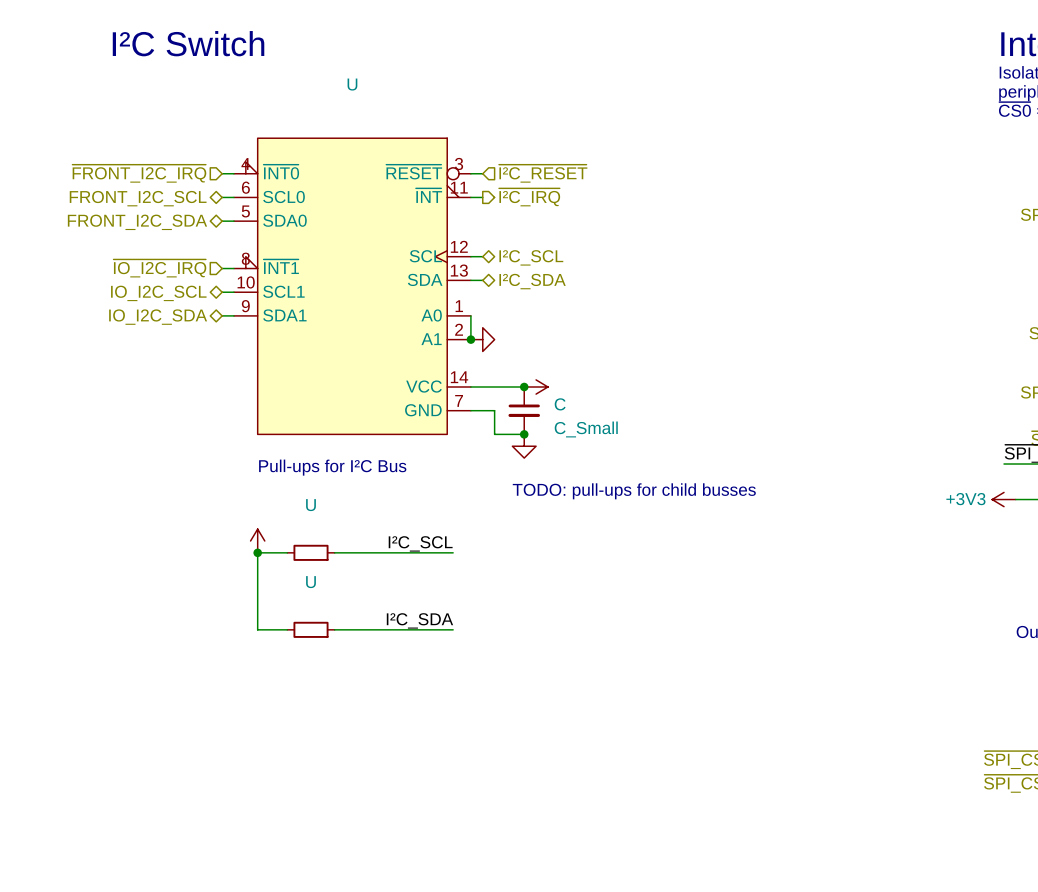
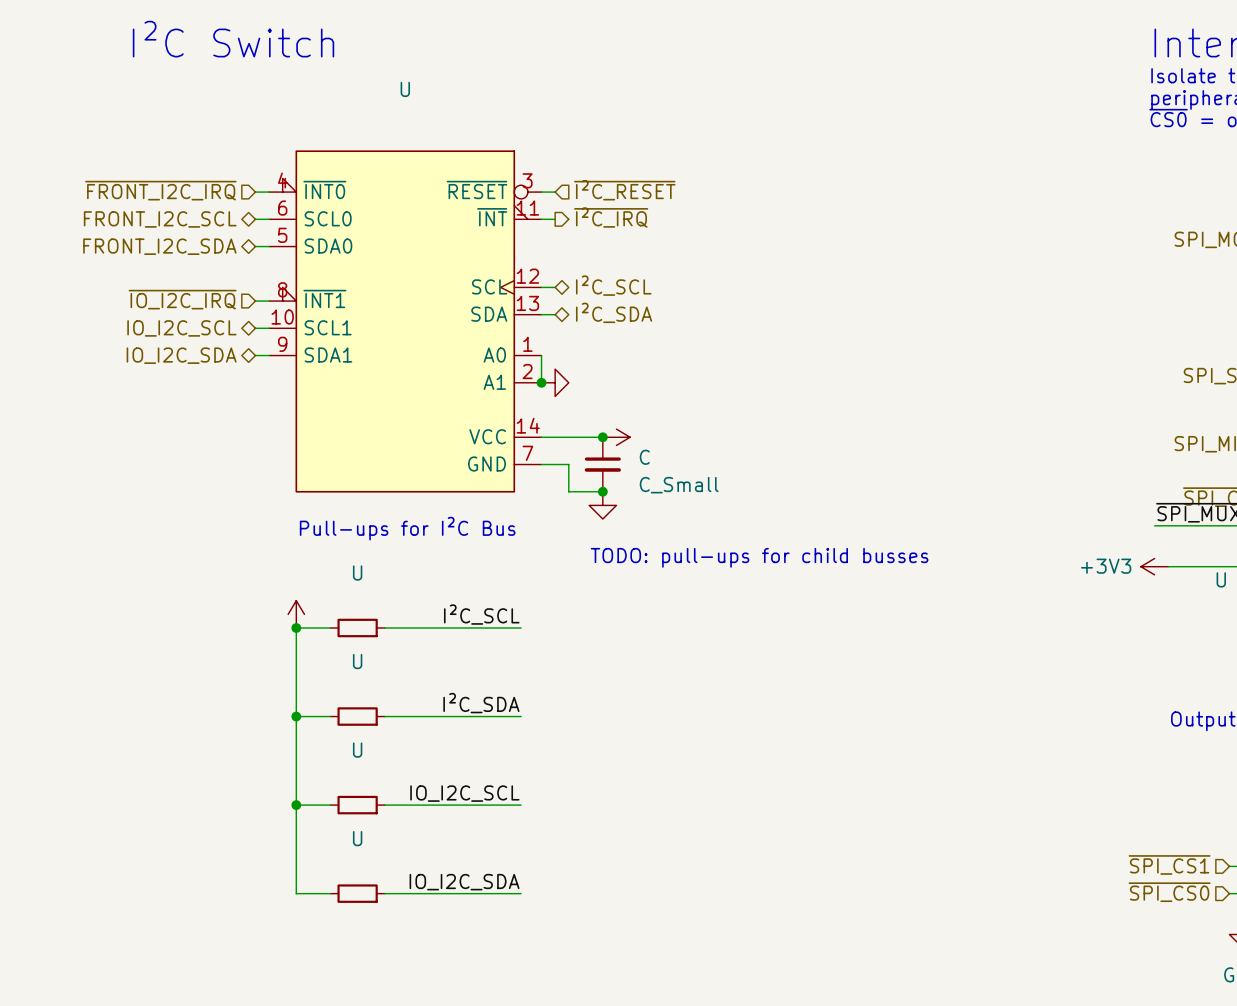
wire: none -> (296, 716) (296, 893) (330, 893)
junction: none -> (296, 716)
label: none -> IO_I2C_SCL (464, 793)
wire: none -> (296, 805) (330, 805)
junction: none -> (296, 805)
U: none -> (357, 805)
wire: none -> (384, 805) (521, 805)
label: none -> IO_I2C_SDA (464, 882)
U: none -> (357, 893)
wire: none -> (384, 893) (521, 893)

